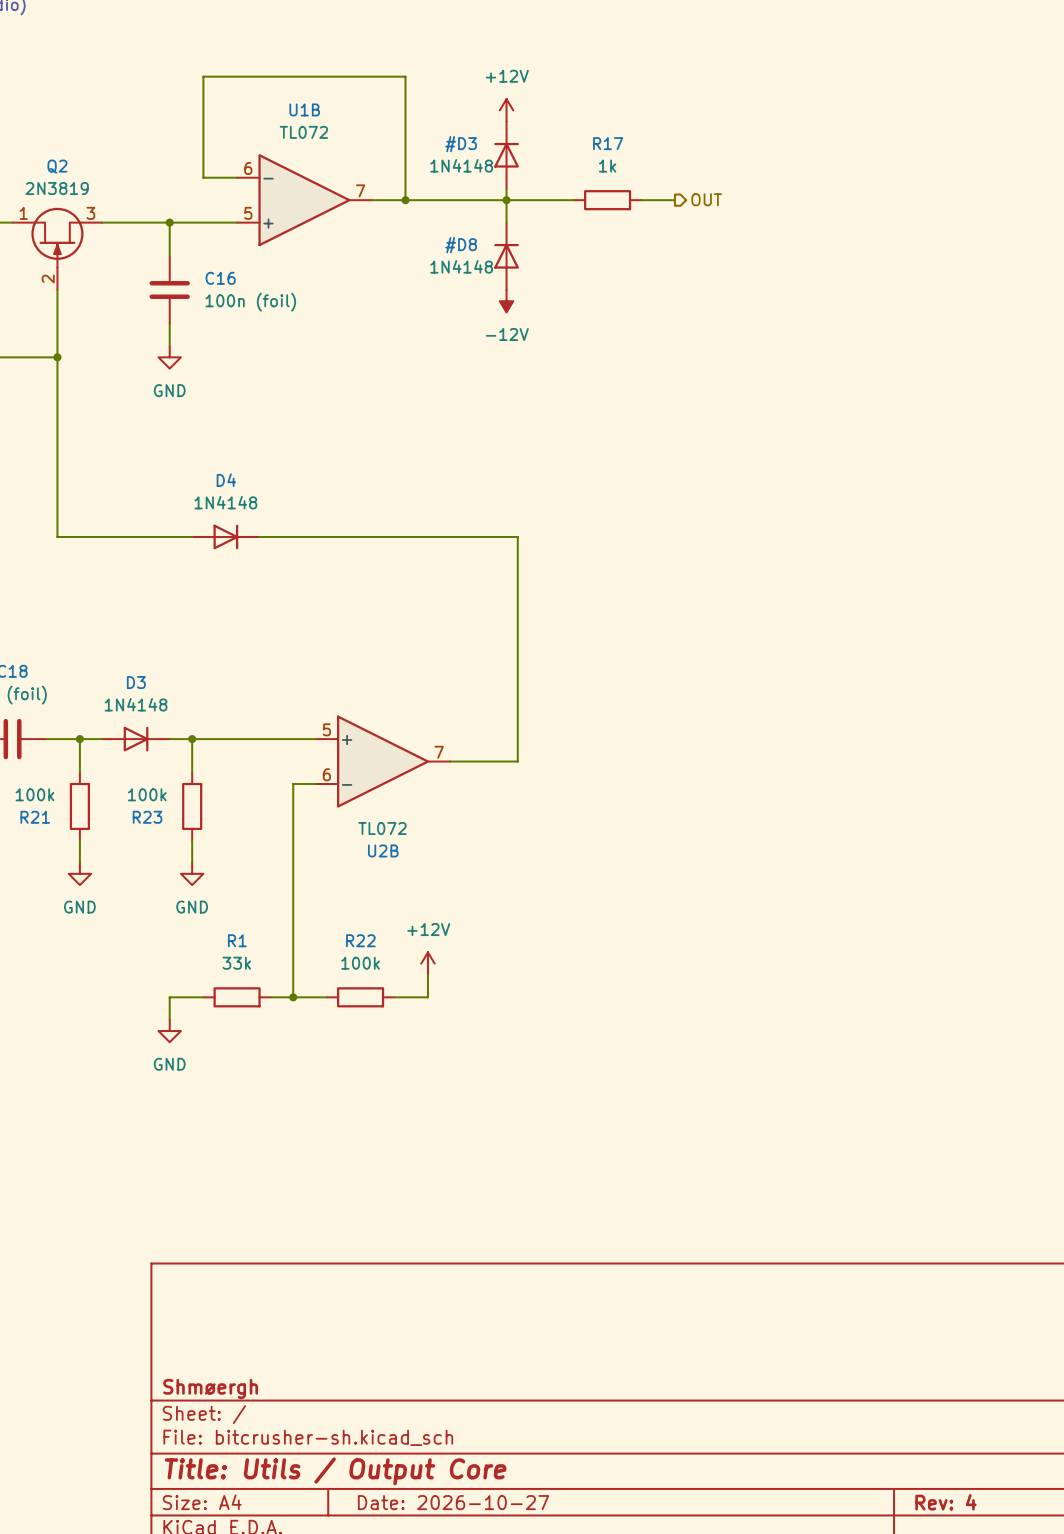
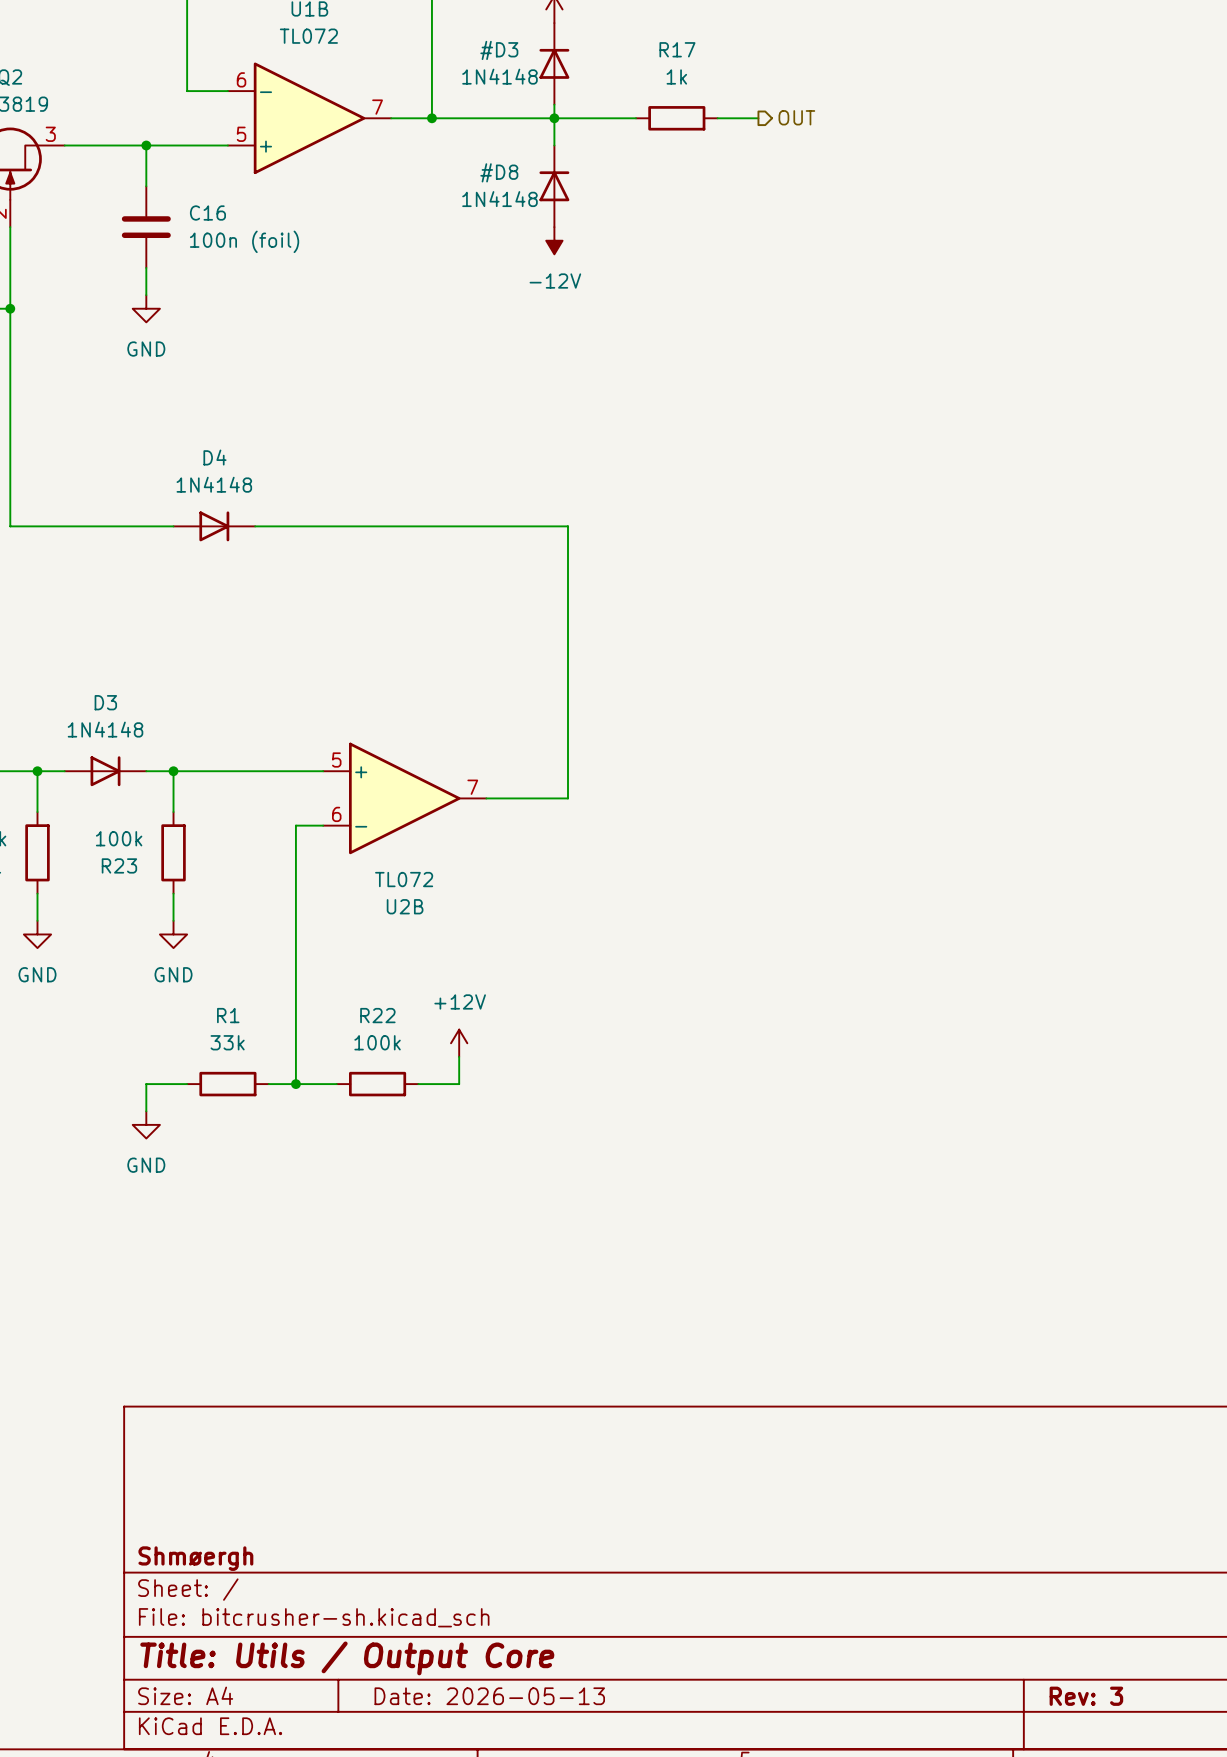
title block: Date: 2026-10-27 (453, 1502) -> Date: 2026-05-13 (489, 1696)
title block: Rev: 4 (945, 1502) -> Rev: 3 (1086, 1696)

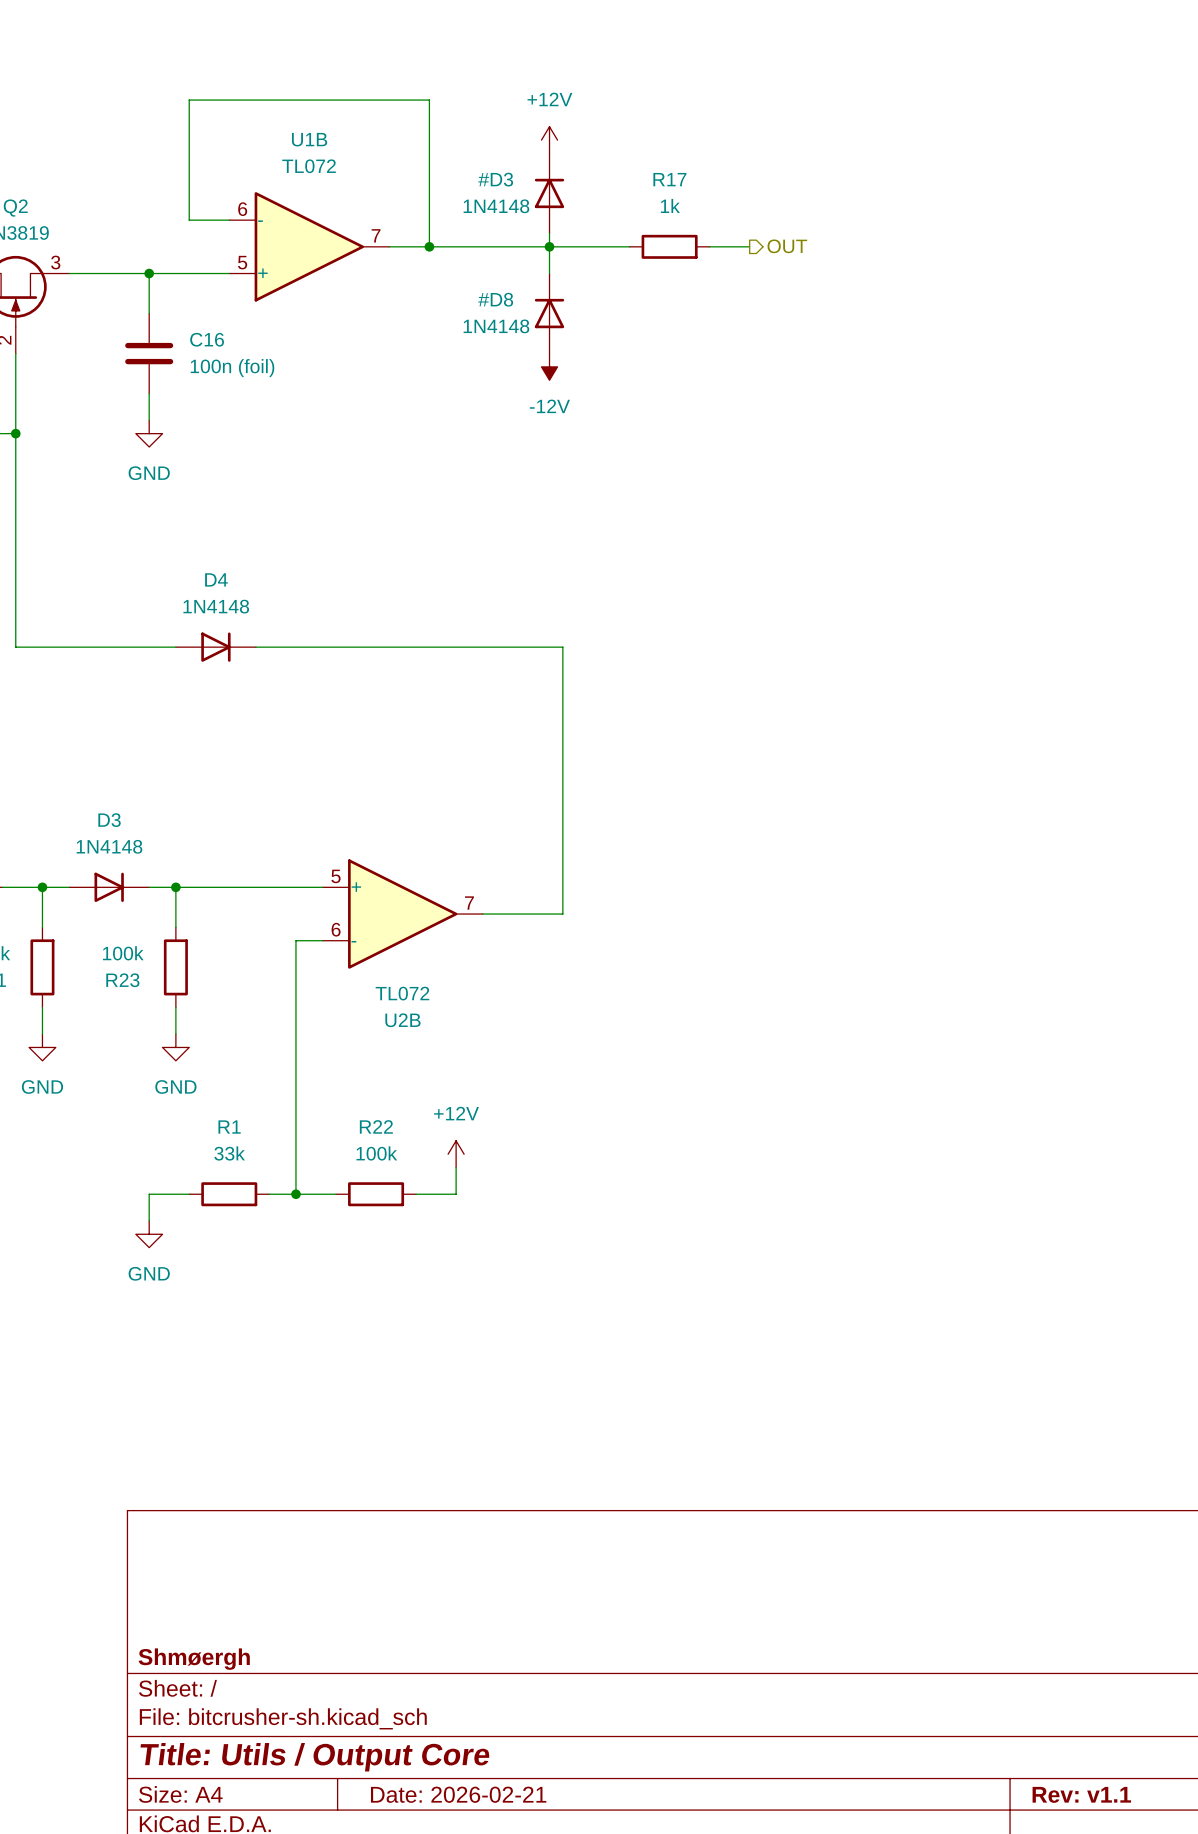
title block: Date: 2026-05-13 (489, 1696) -> Date: 2026-02-21 (458, 1794)
title block: Rev: 3 (1086, 1696) -> Rev: v1.1 (1081, 1794)

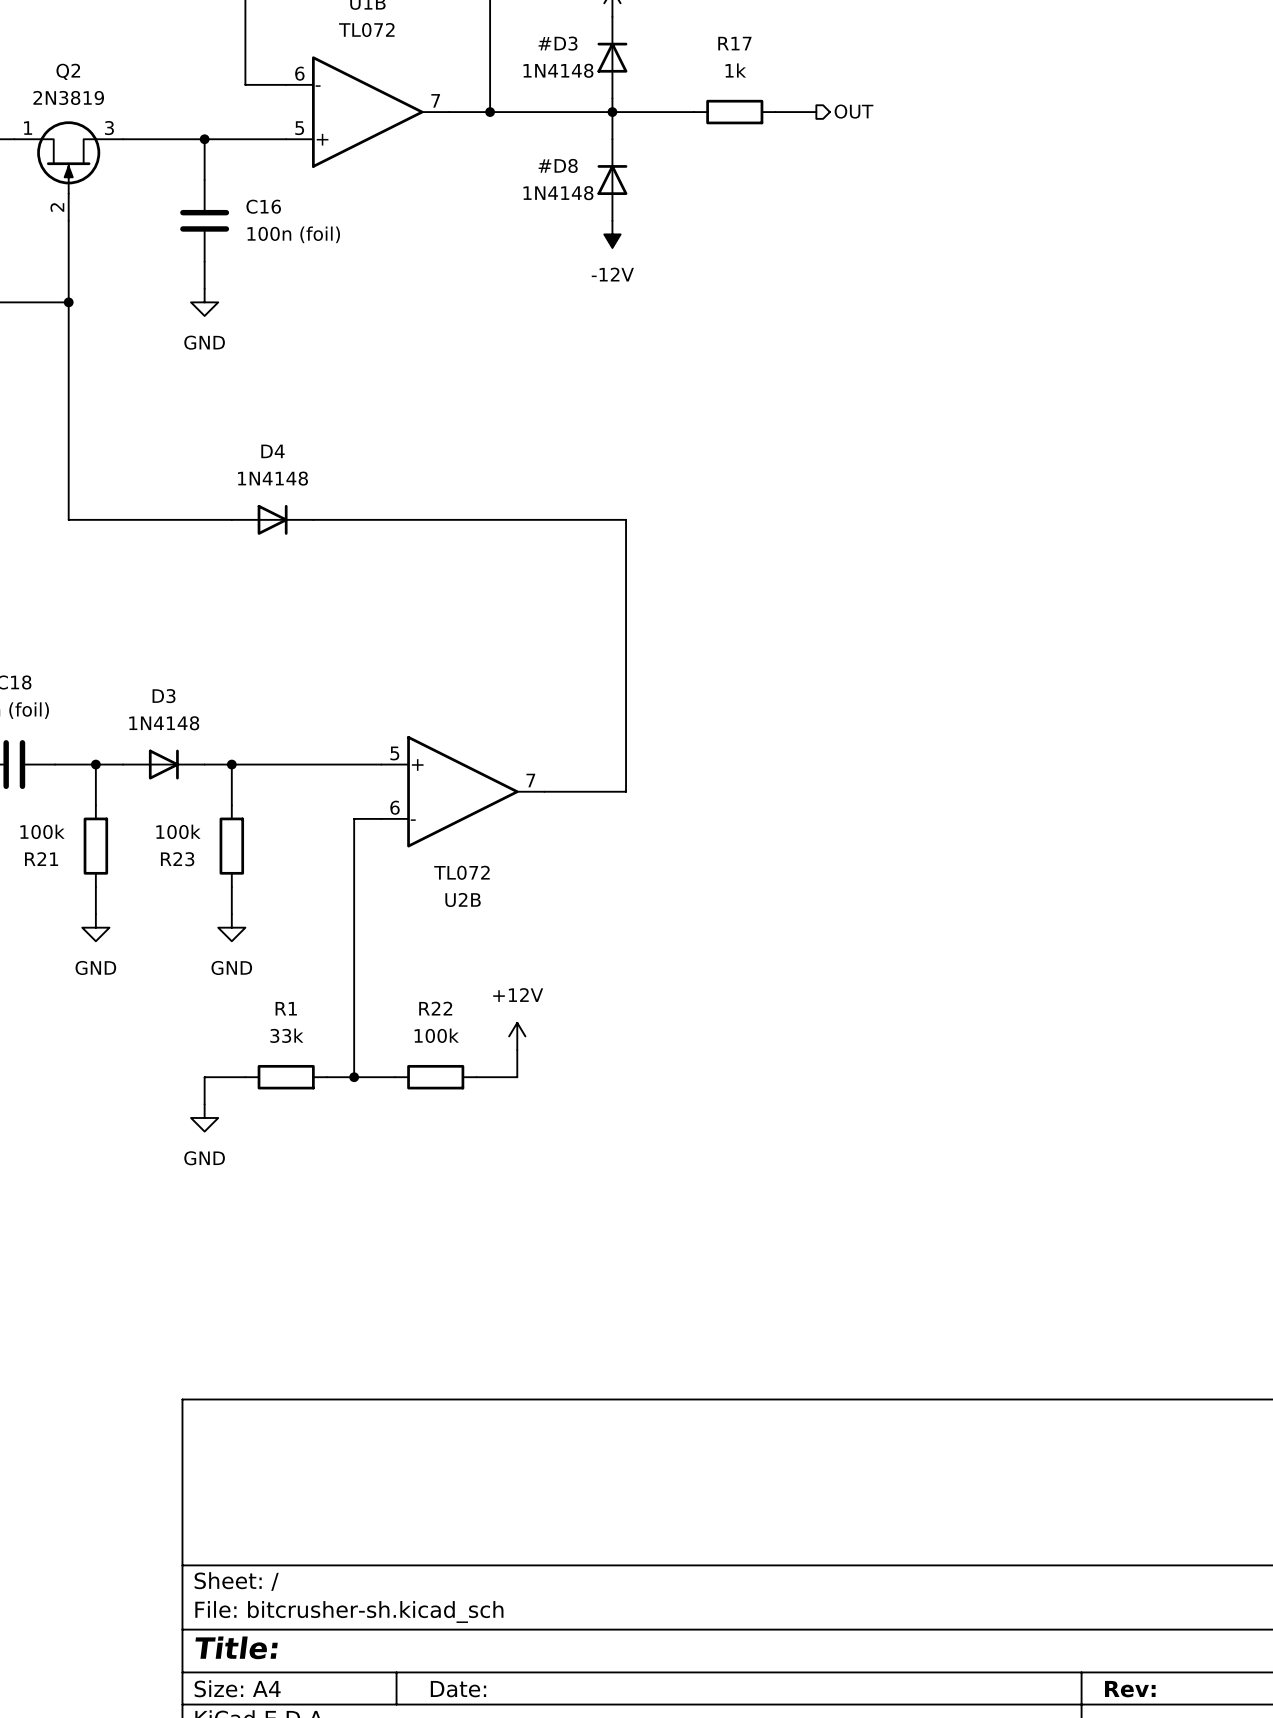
title block: Shmøergh (194, 1659) -> none
title block: Title: Utils / Output Core (315, 1757) -> Title: (236, 1647)
title block: Date: 2026-02-21 (458, 1794) -> Date: (458, 1689)
title block: Rev: v1.1 (1081, 1794) -> Rev: (1130, 1689)

